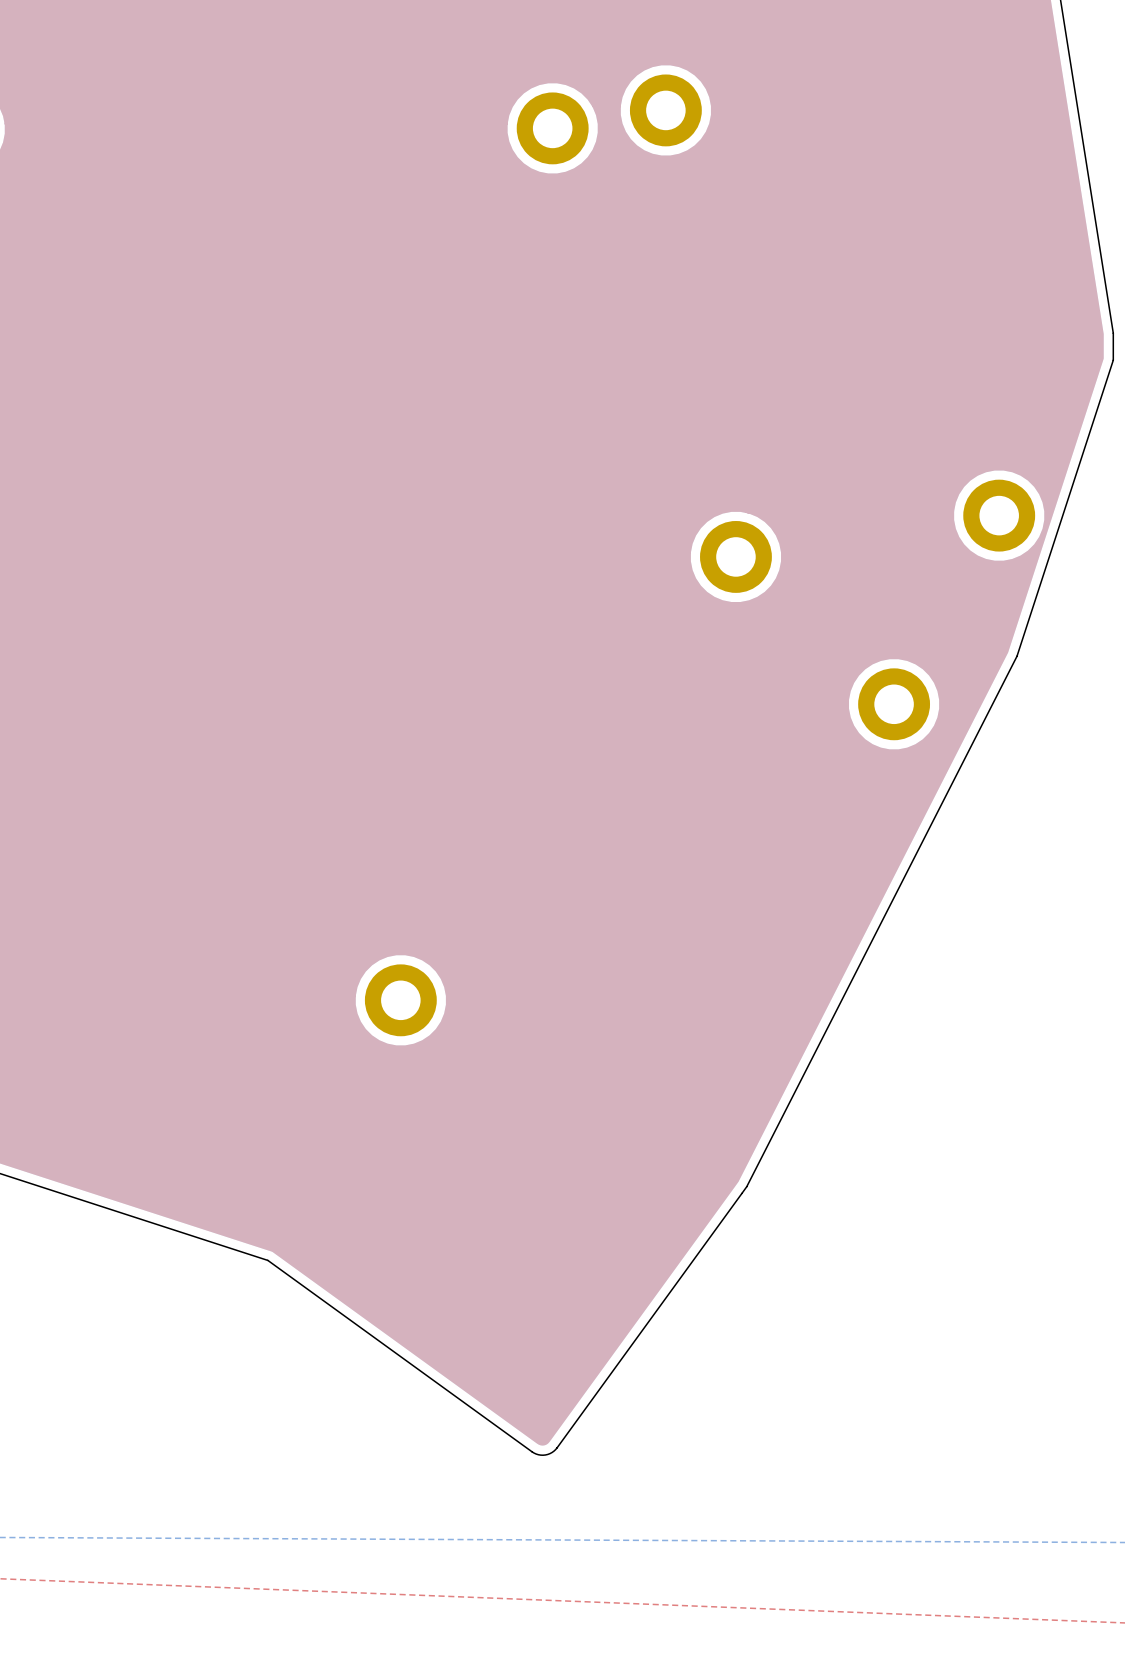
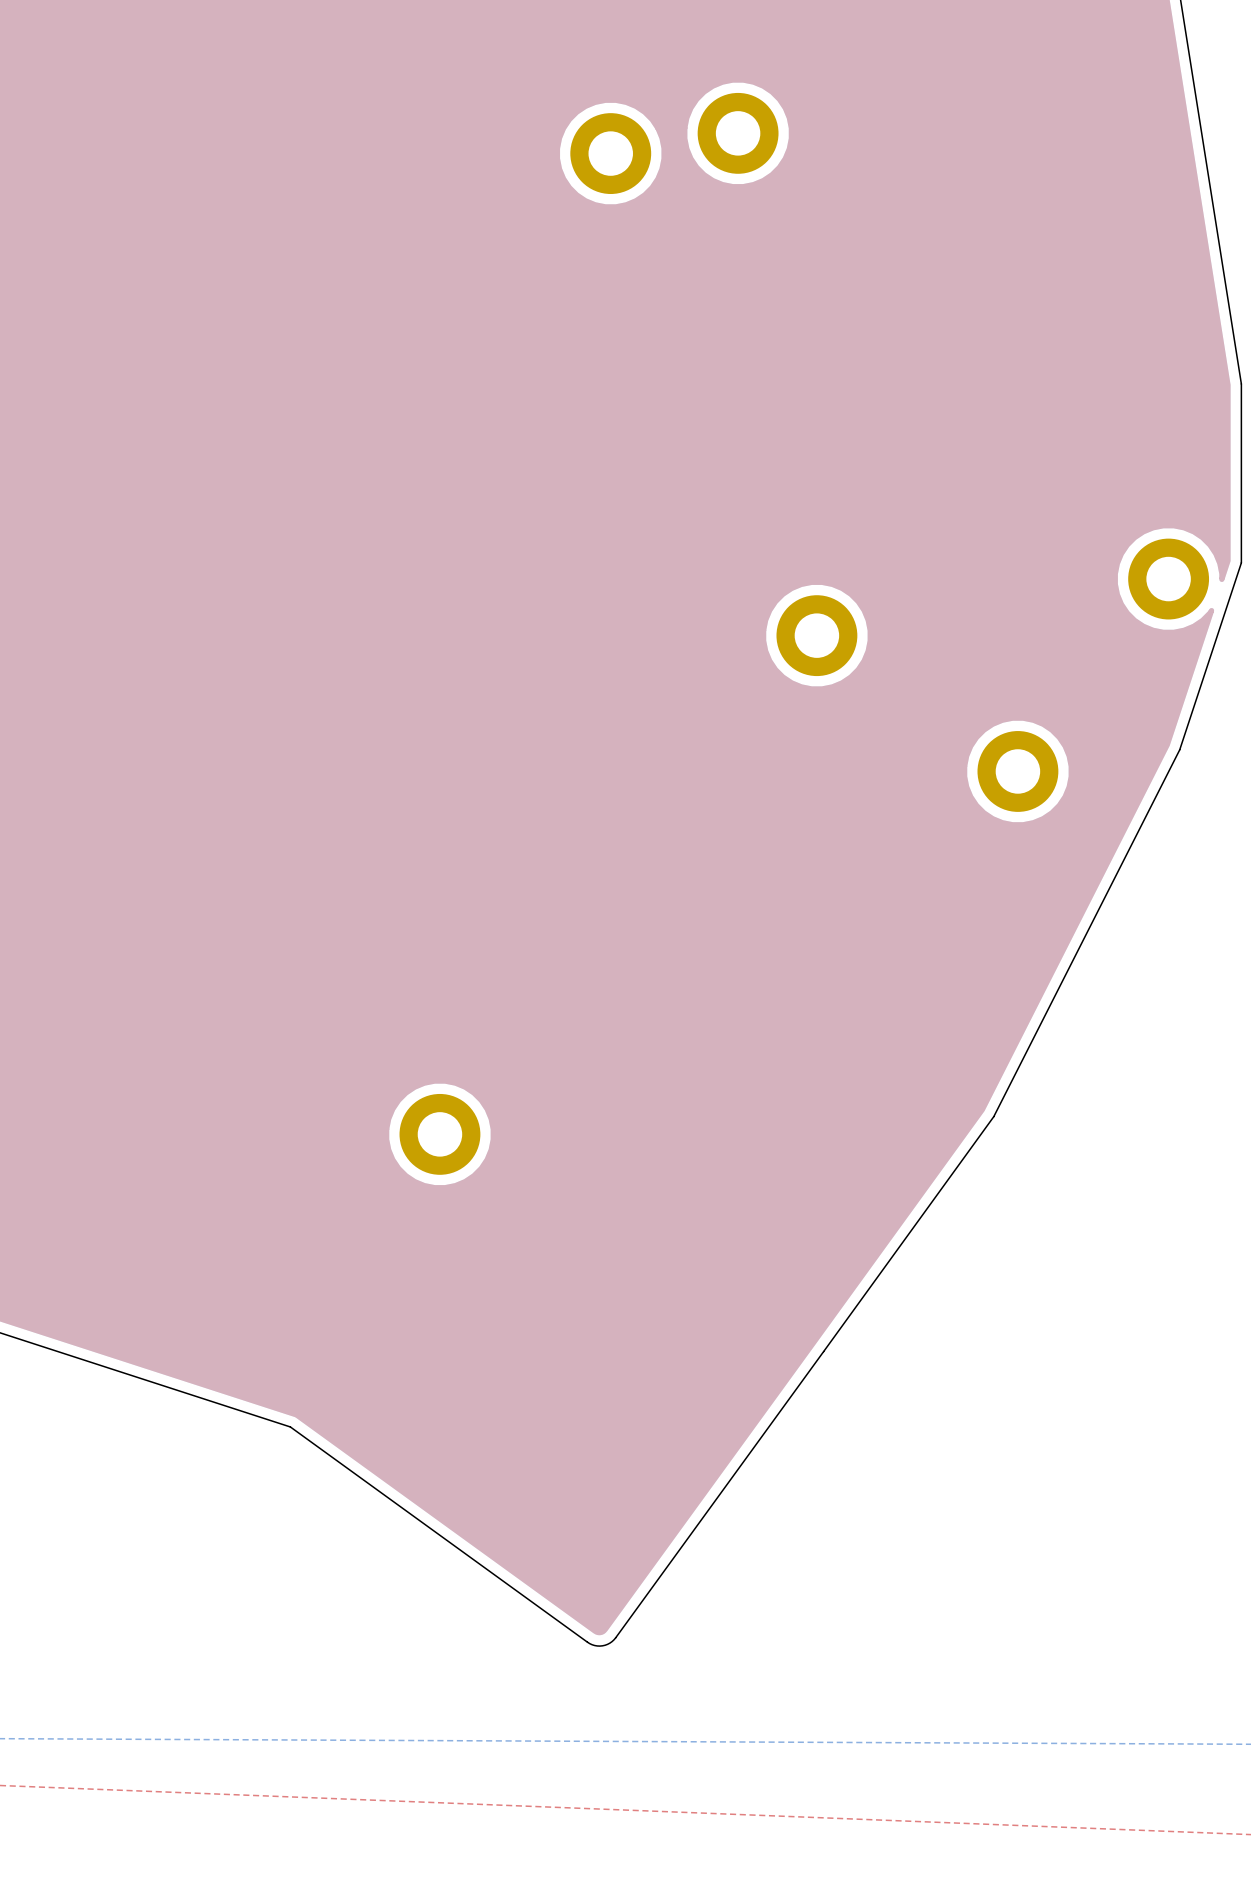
board edge: (1113, 360) (1016, 656) (741, 1193) -> (1241, 414) (1241, 562) (1179, 749) (993, 1116) (823, 1351)
part position: (999, 515) -> (1168, 579)
part position: (894, 704) -> (1017, 771)

